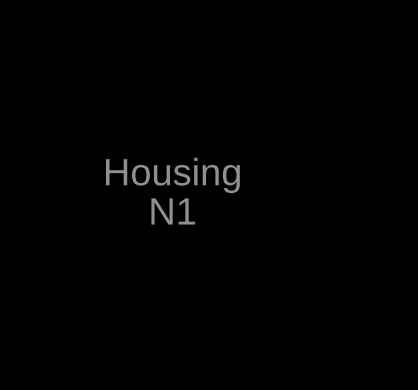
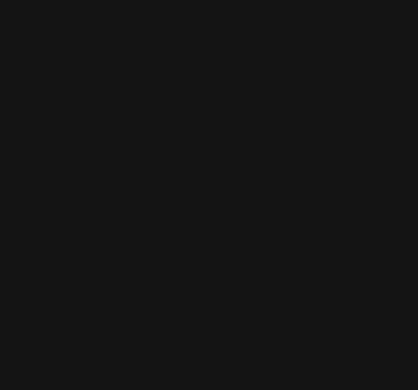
N1: Housing (172, 191) -> none

